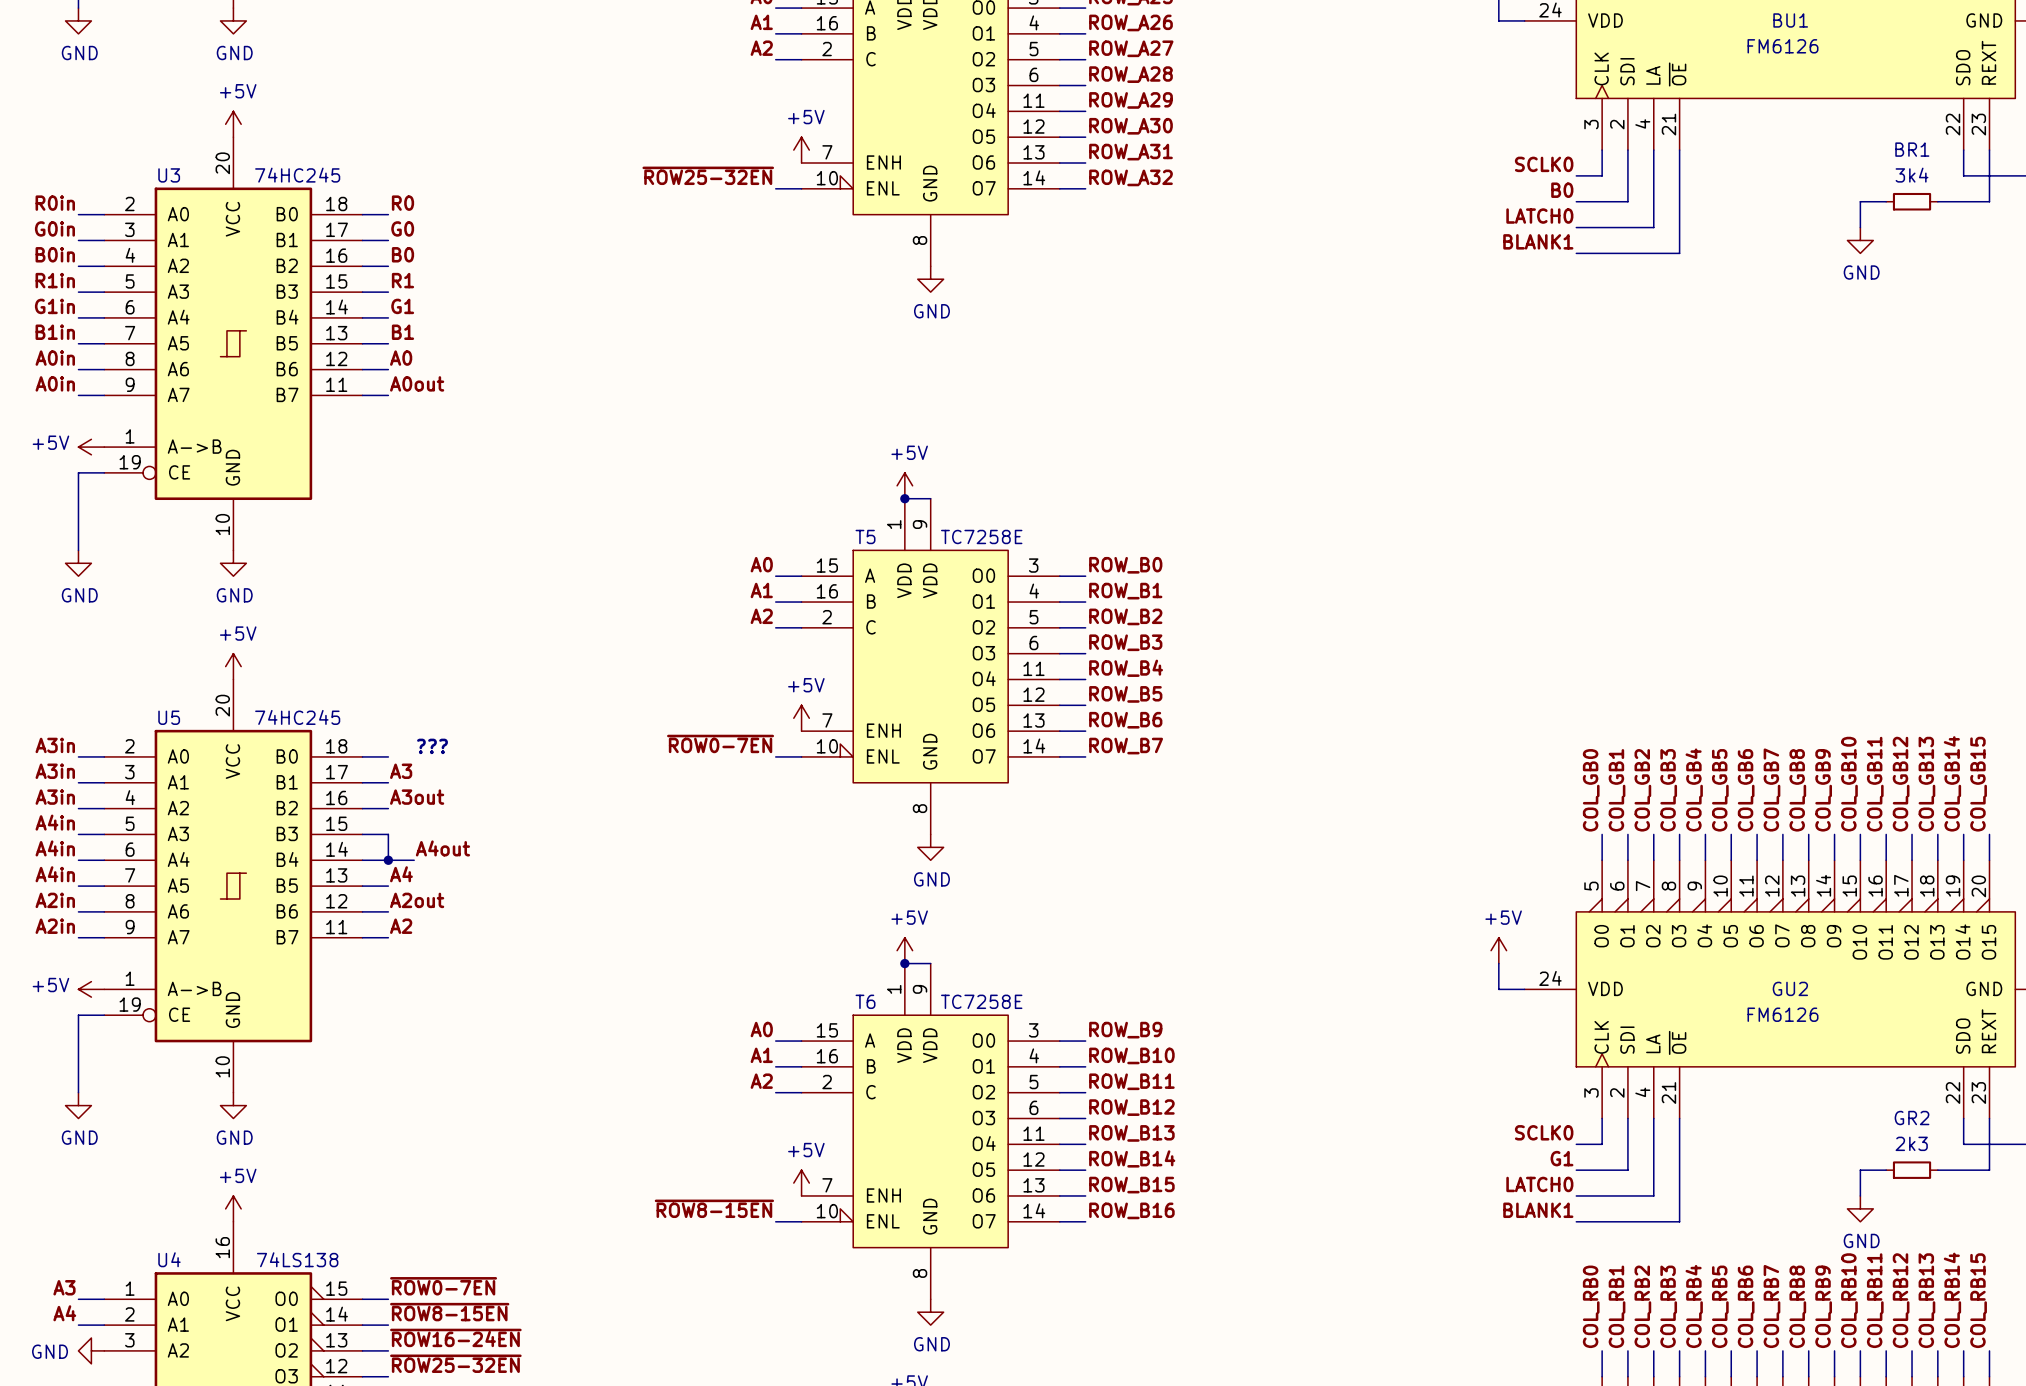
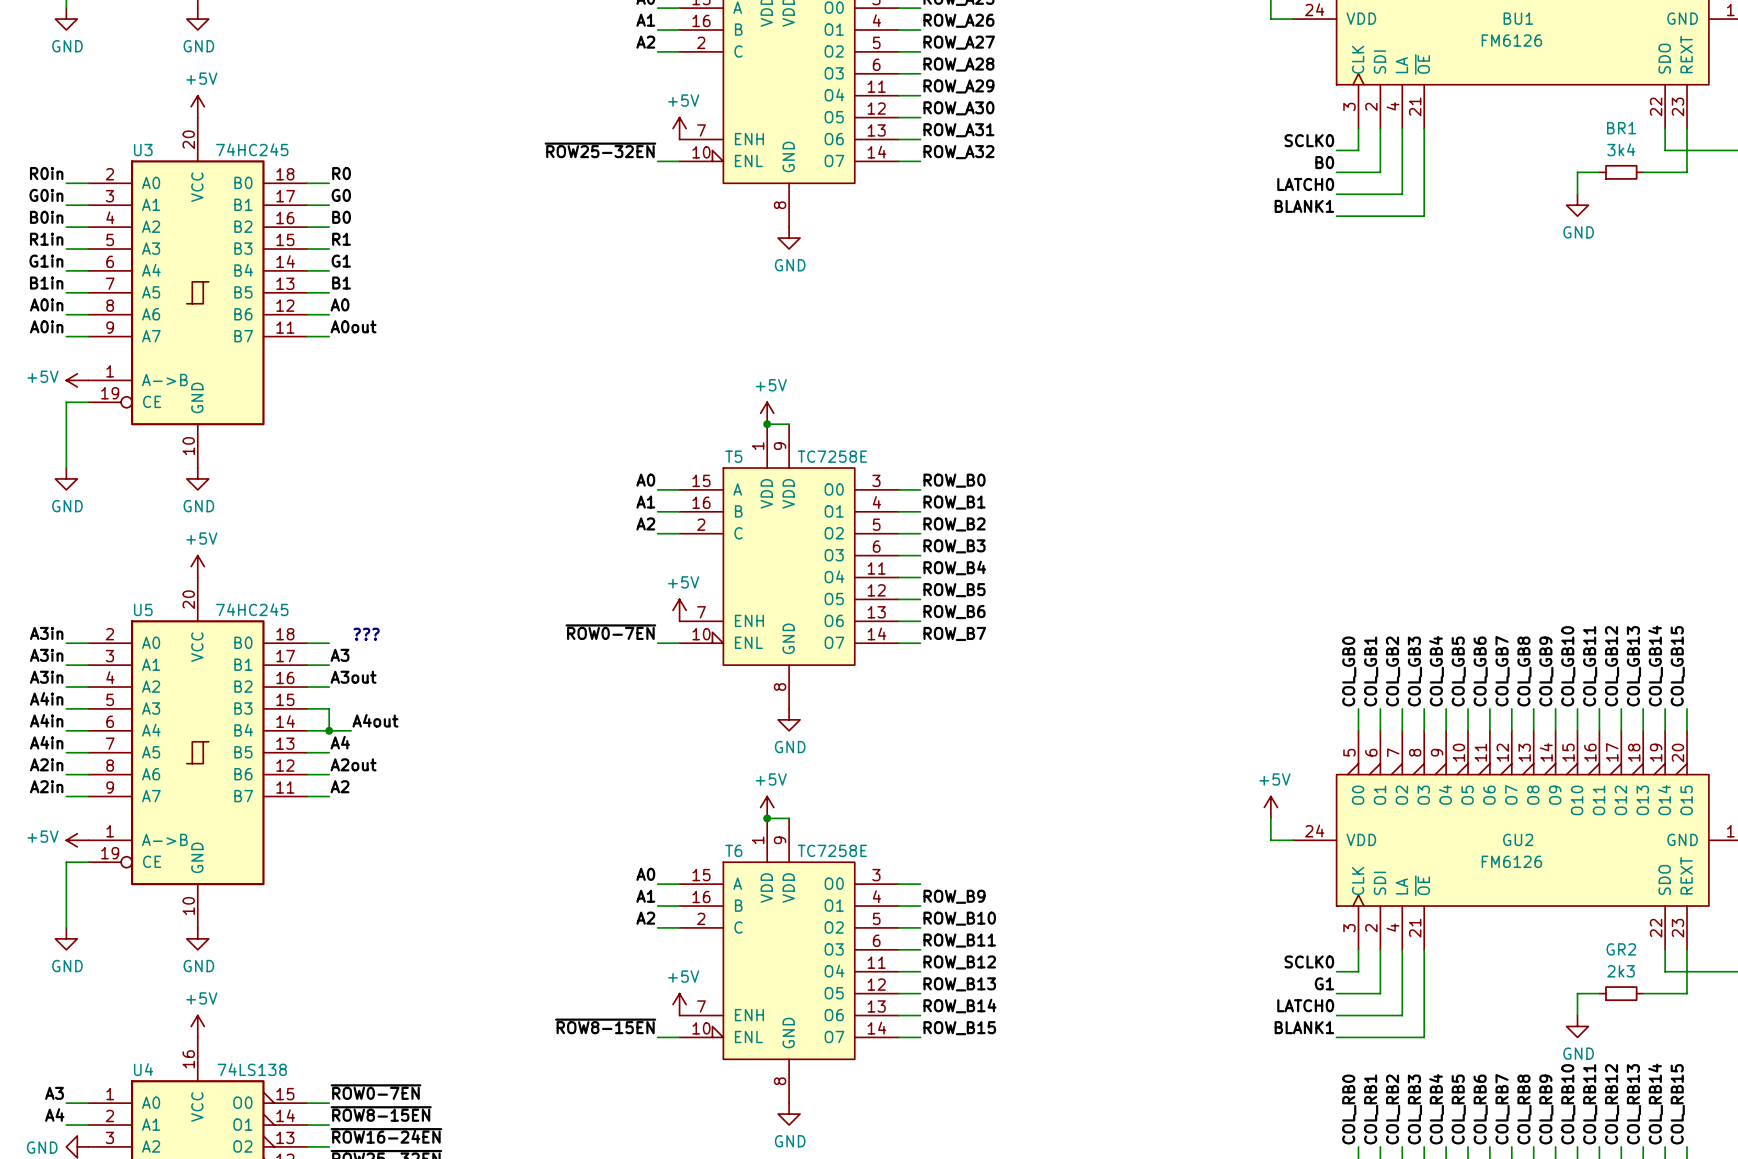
label: ROW_B9 (1125, 1030) -> none
label: ROW_B10 (1131, 1055) -> ROW_B9 (954, 896)
label: ROW_B11 (1131, 1081) -> ROW_B10 (959, 918)
label: ROW_B12 (1131, 1107) -> ROW_B11 (959, 940)
label: ROW_B13 (1131, 1133) -> ROW_B12 (959, 962)
label: ROW_B14 (1132, 1158) -> ROW_B13 (959, 984)
label: ROW_B15 (1131, 1185) -> ROW_B14 (959, 1006)
label: ROW_B16 (1131, 1210) -> ROW_B15 (959, 1028)

